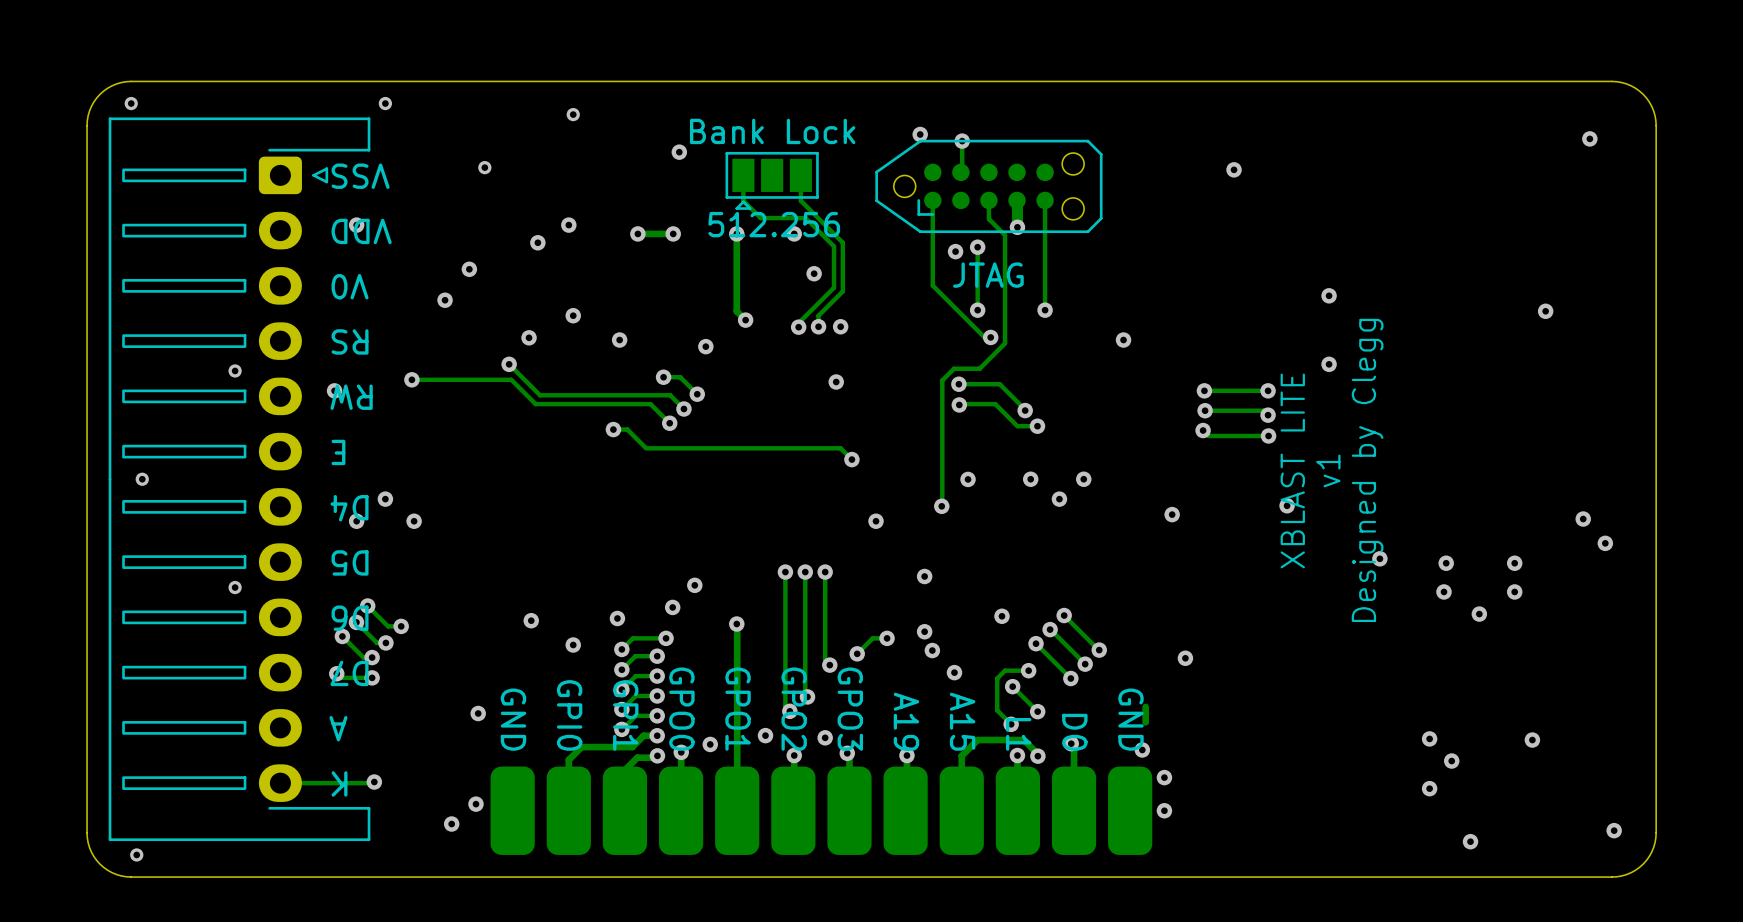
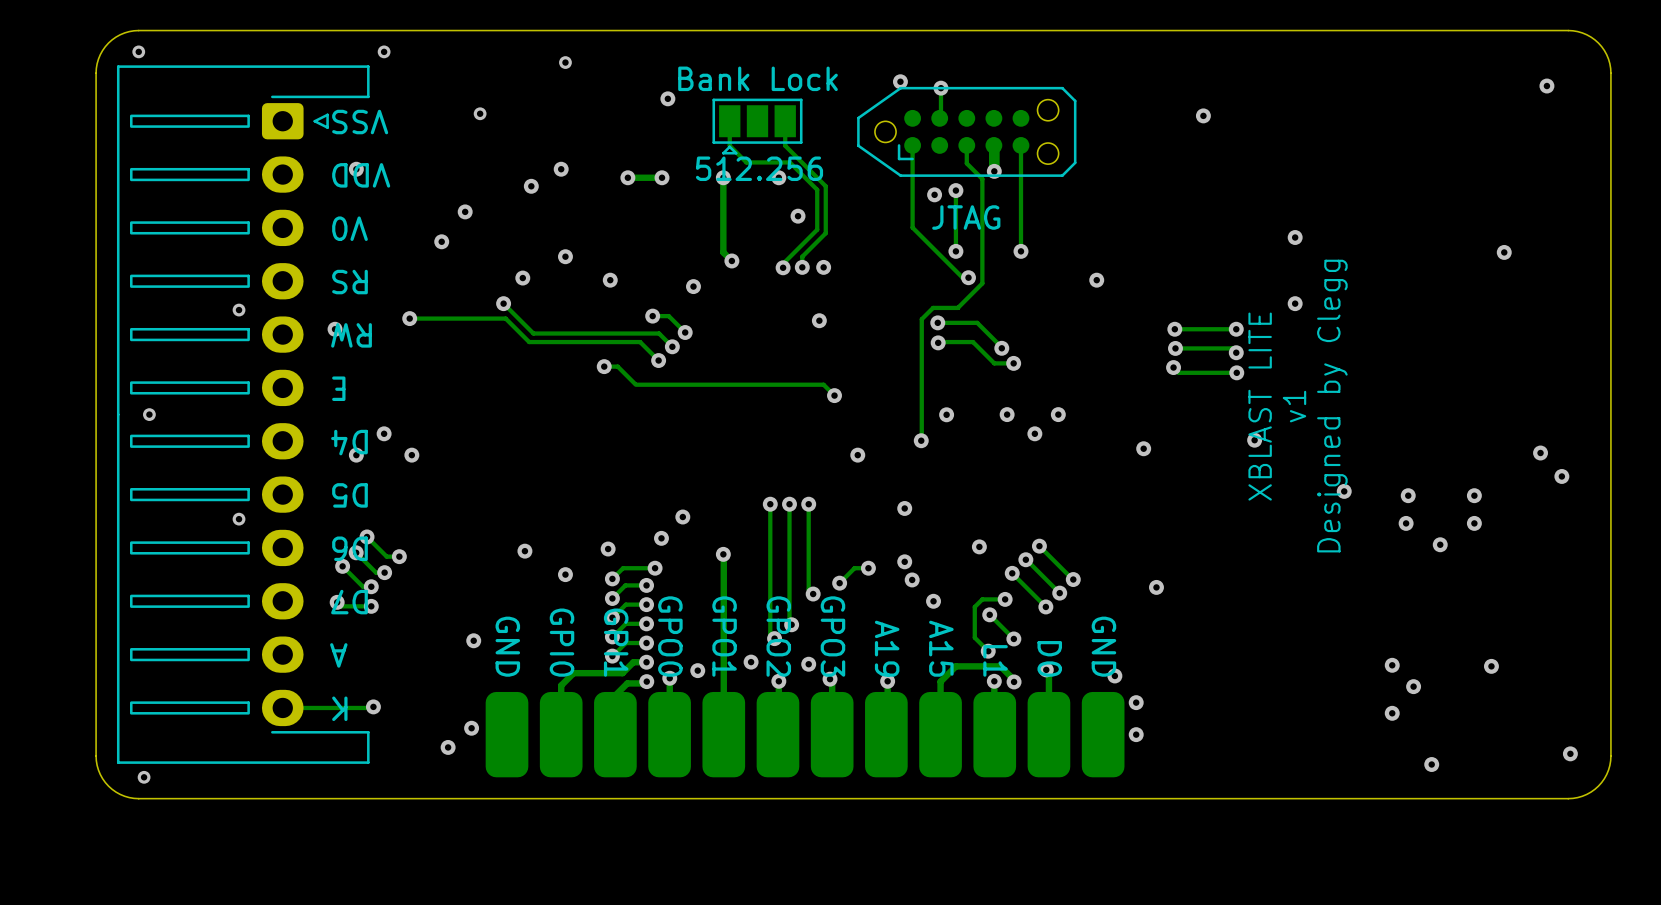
track: (1145, 706) (1145, 722) -> none

